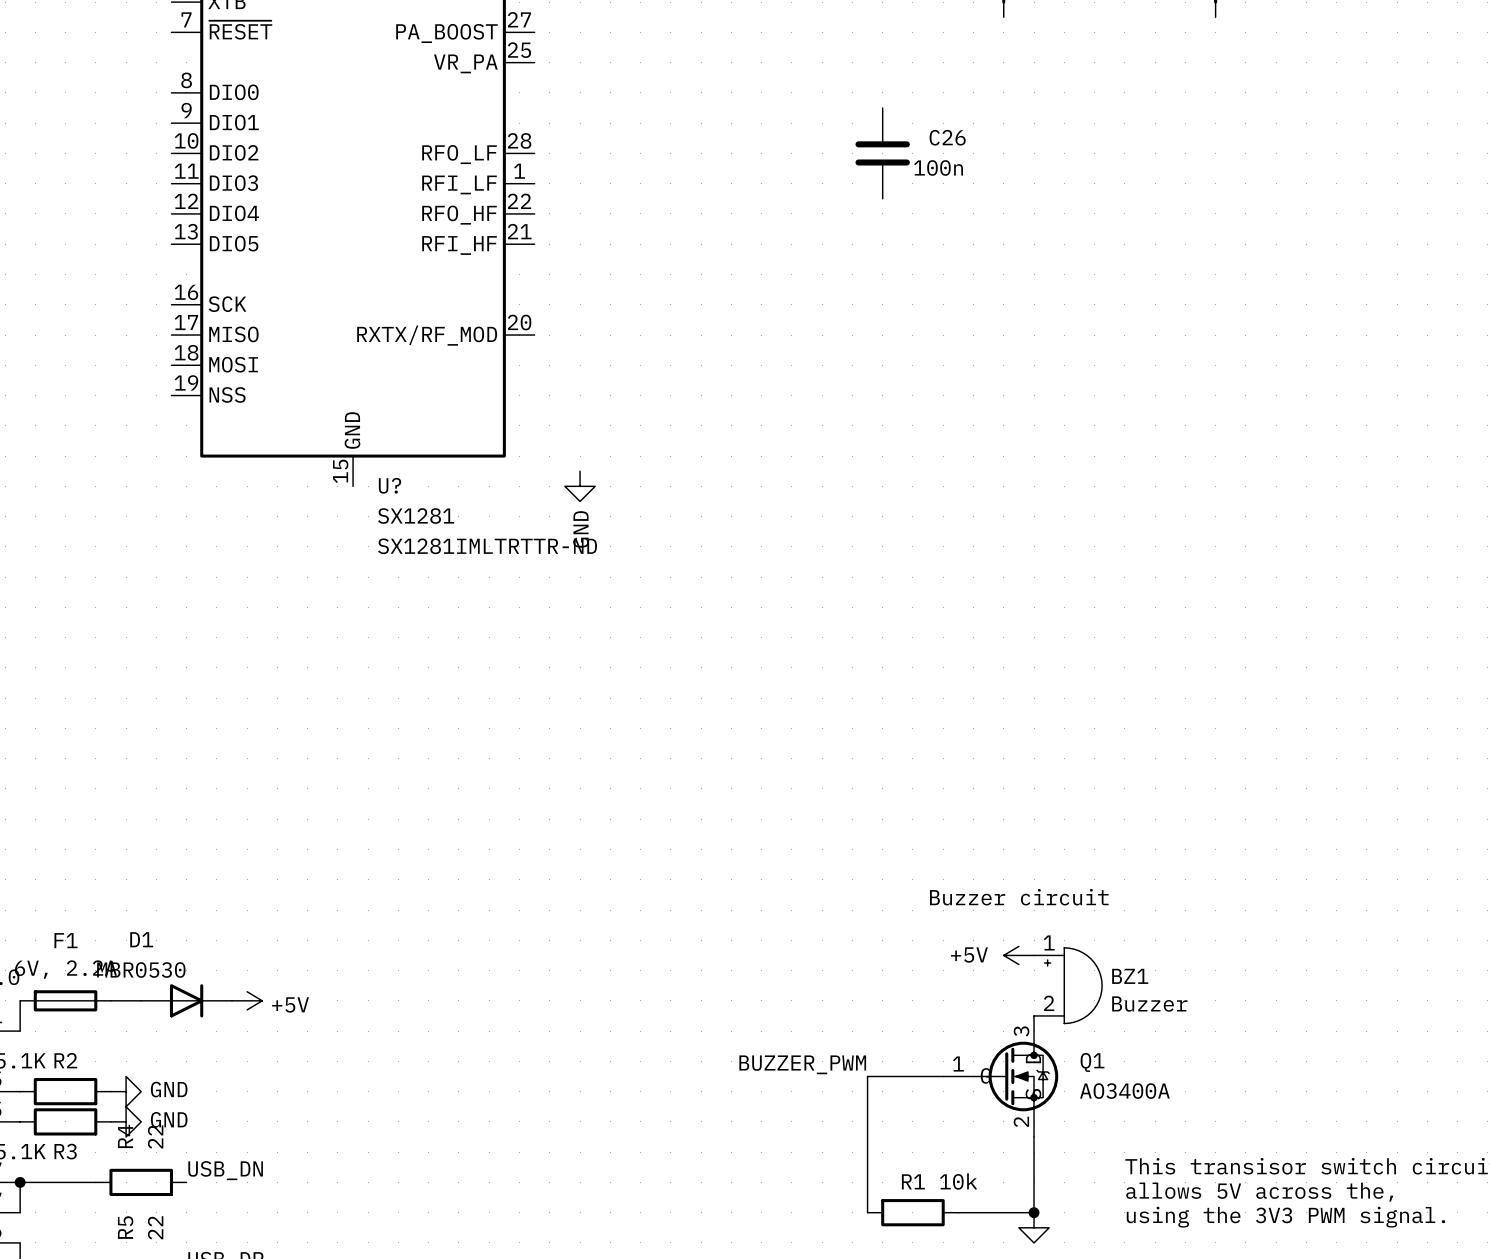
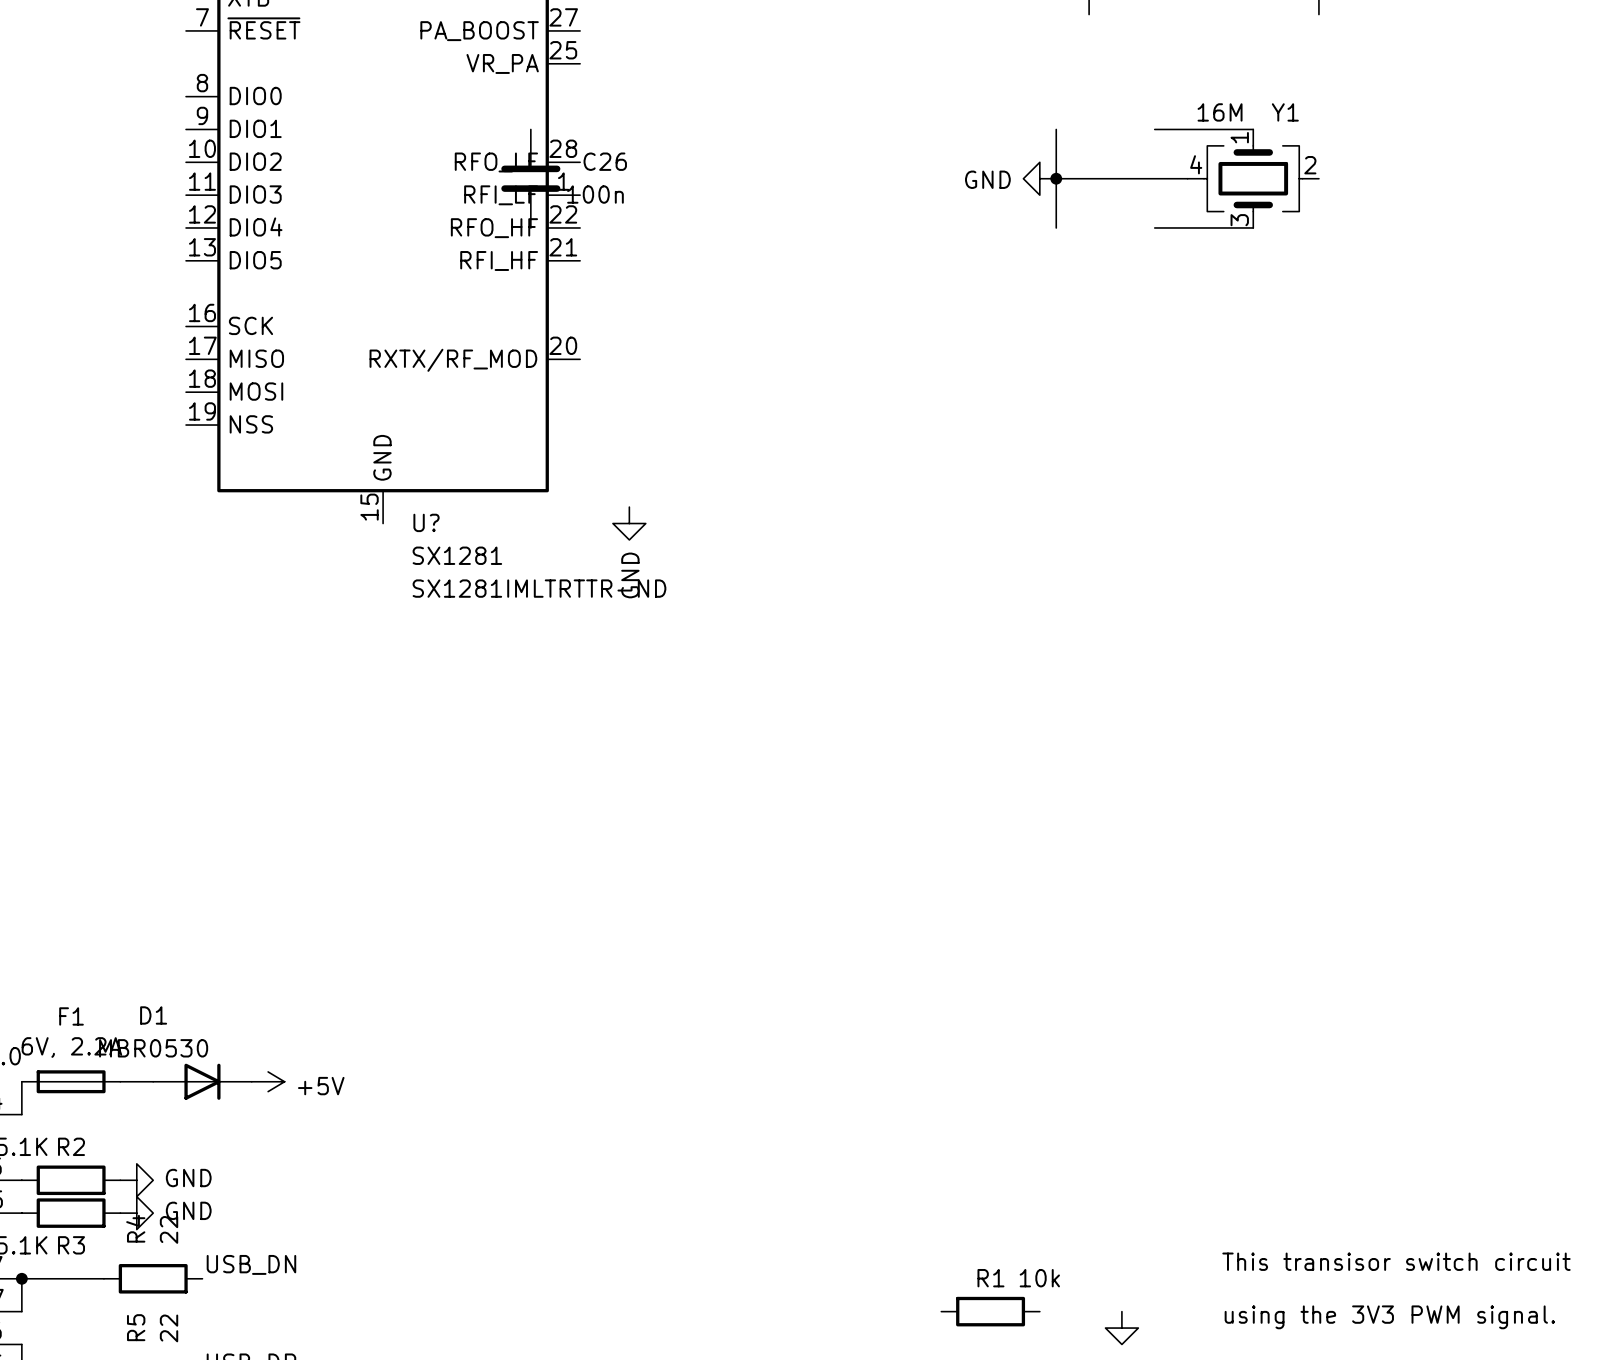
wire: none -> (1056, 129) (1056, 227)
wire: none -> (1154, 129) (1253, 129)
C26 position: (882, 153) -> (530, 178)
power symbol: none -> GND (1039, 178)
wire: none -> (1056, 178) (1187, 178)
junction: none -> (1056, 178)
Y1: none -> 16M (1253, 178)
wire: none -> (1154, 227) (1253, 227)
text: Buzzer circuit (1019, 897) -> none
power symbol: +5V (1018, 955) -> none
BZ1: Buzzer (1068, 985) -> none
label: BUZZER_PWM (802, 1064) -> none
wire: (943, 1076) (867, 1076) (867, 1212) -> none
Q1: AO3400A (1000, 1076) -> none
wire: (1034, 1137) (1034, 1212) (958, 1212) -> none
text: allows 5V across the, (1259, 1192) -> none
junction: (1034, 1212) -> none

